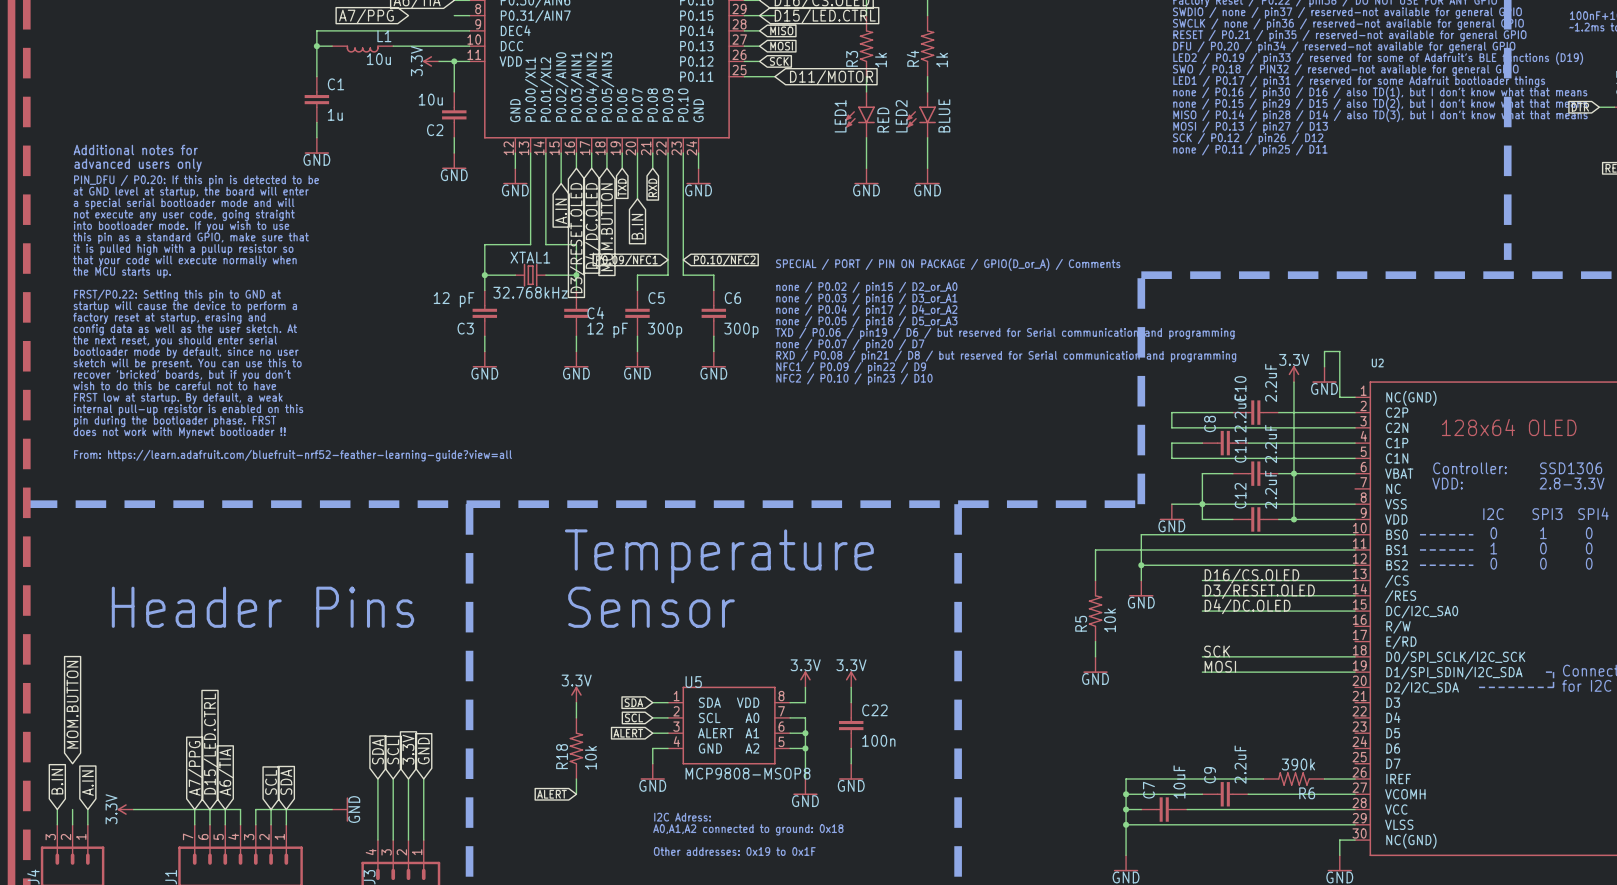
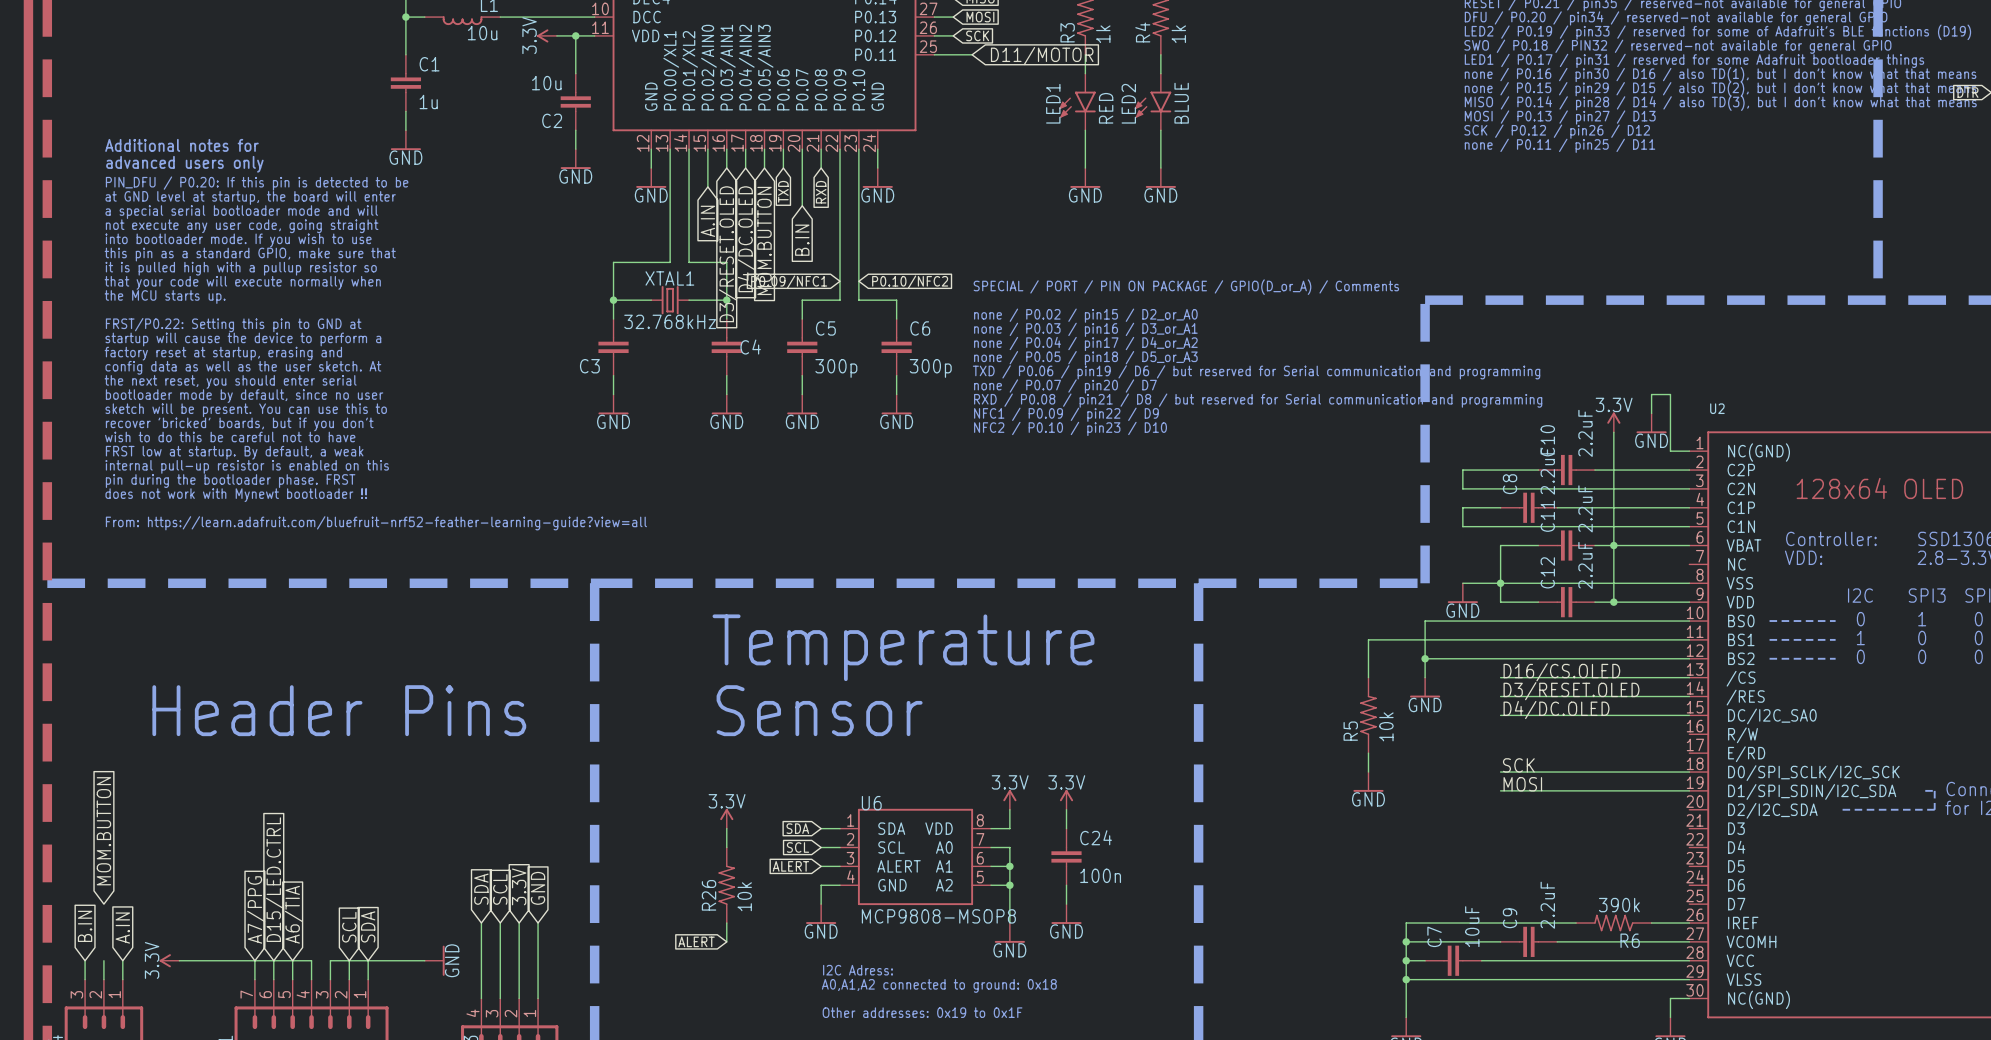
C3 value: 12 pF (454, 299) -> none
C4 value: 12 pF (607, 330) -> none
U5 name: U5 (693, 682) -> U6 (871, 803)
C22 name: C22 (874, 710) -> C24 (1096, 837)
R18 name: R18 (562, 756) -> R26 (709, 895)

